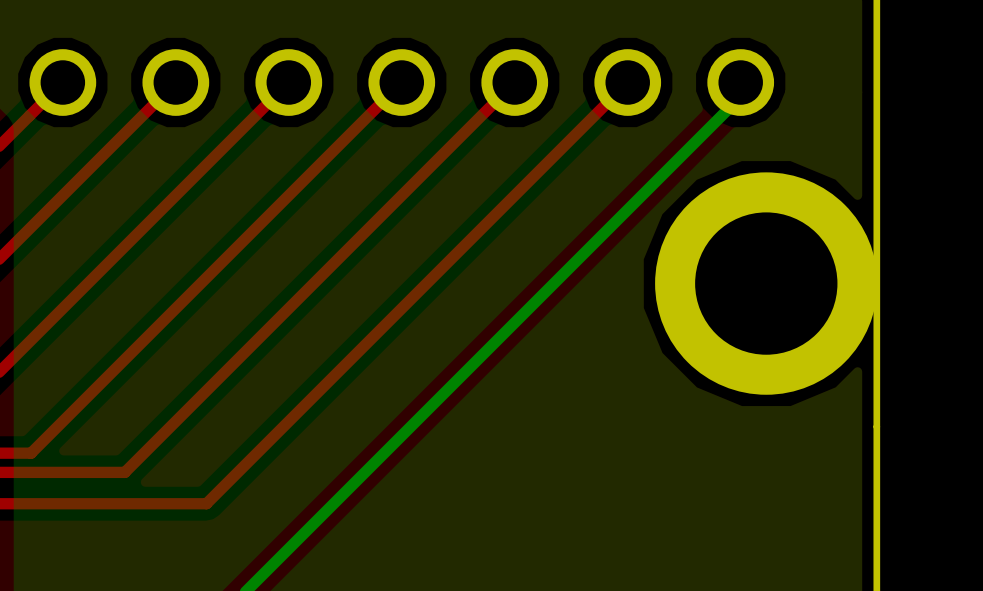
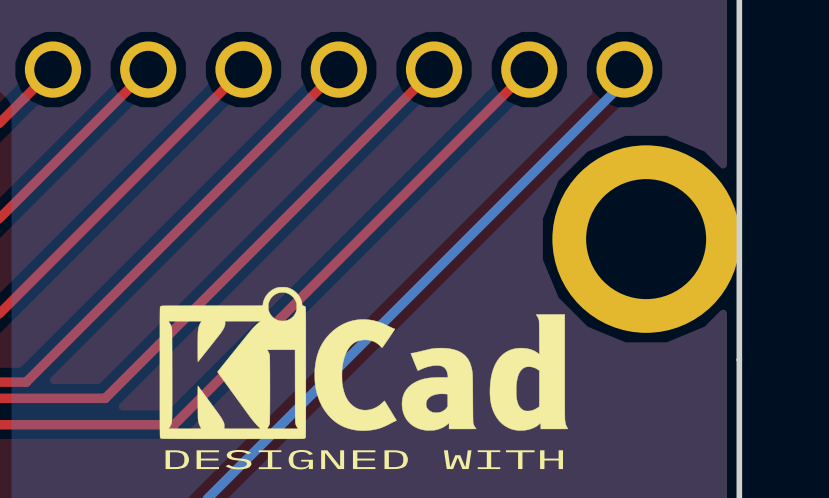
drawing: none -> [159, 286, 569, 440]

